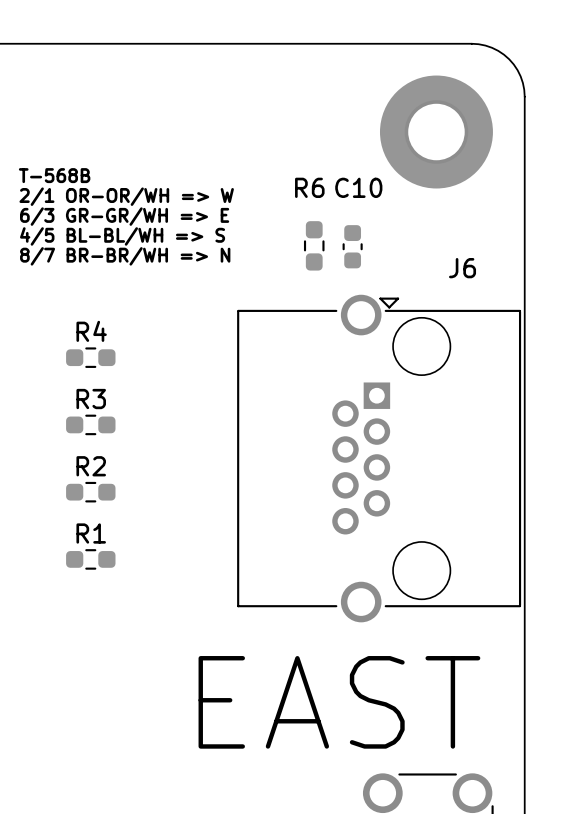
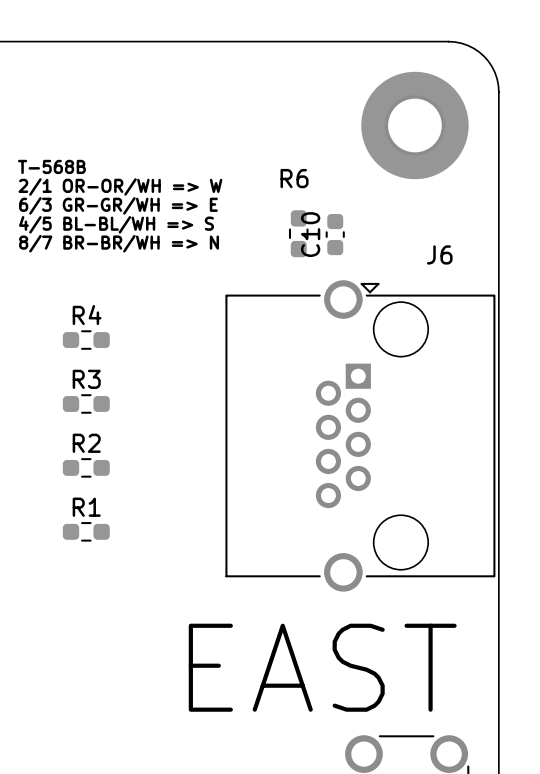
C10 name rotation: 0° (358, 187) -> 90° counterclockwise (310, 234)
C10 name position: C10 (358, 187) -> C10 (310, 234)

